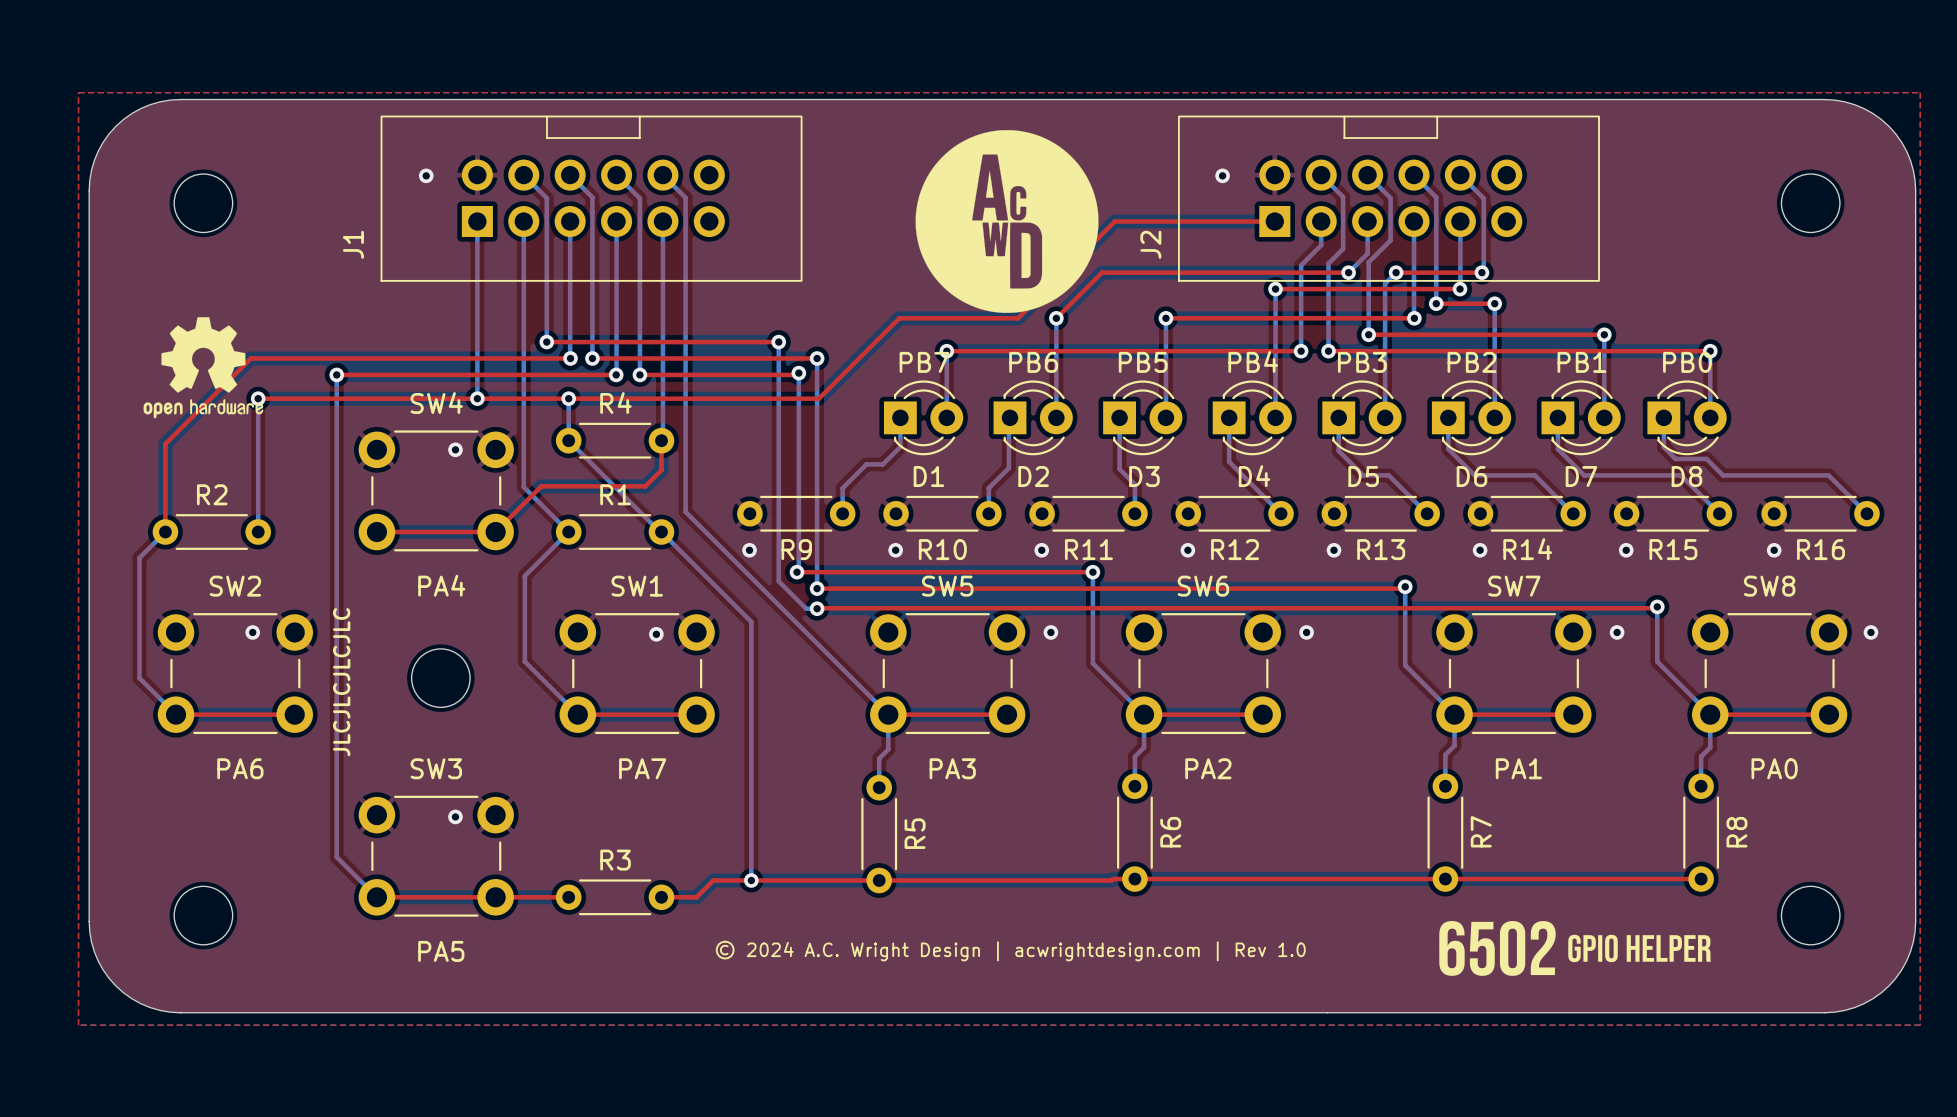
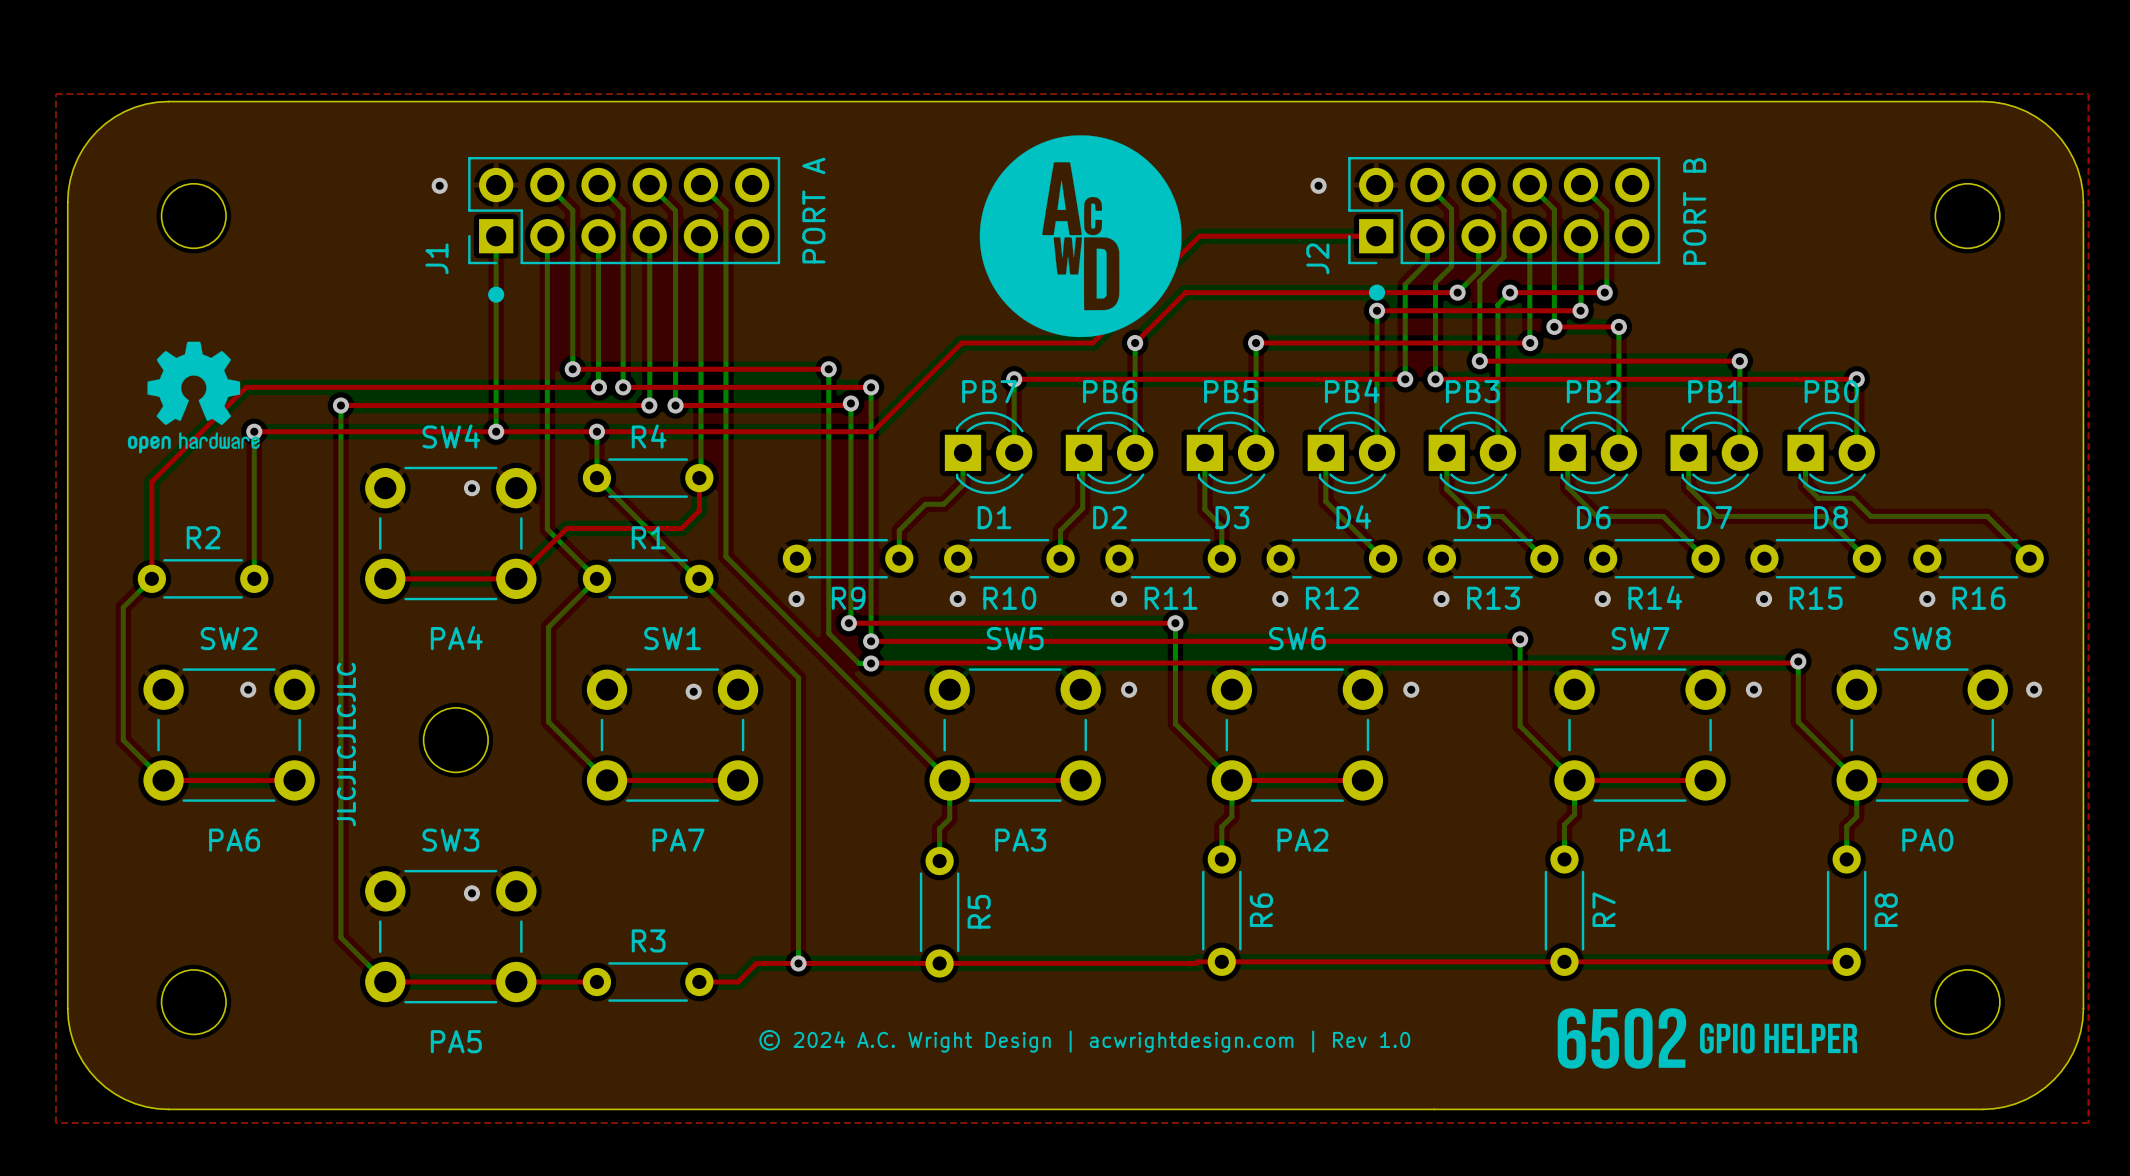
J1 footprint: [380, 115, 803, 282] -> [468, 156, 781, 265]
J2 footprint: [1178, 115, 1600, 282] -> [1348, 156, 1661, 265]
J1 value: none -> PORT A (813, 210)
J2 value: none -> PORT B (1694, 211)
J1 name position: J1 (353, 244) -> J1 (436, 258)
J2 name position: J2 (1150, 244) -> J2 (1317, 258)
drawing: none -> [1368, 284, 1386, 301]
drawing: none -> [488, 286, 505, 303]

